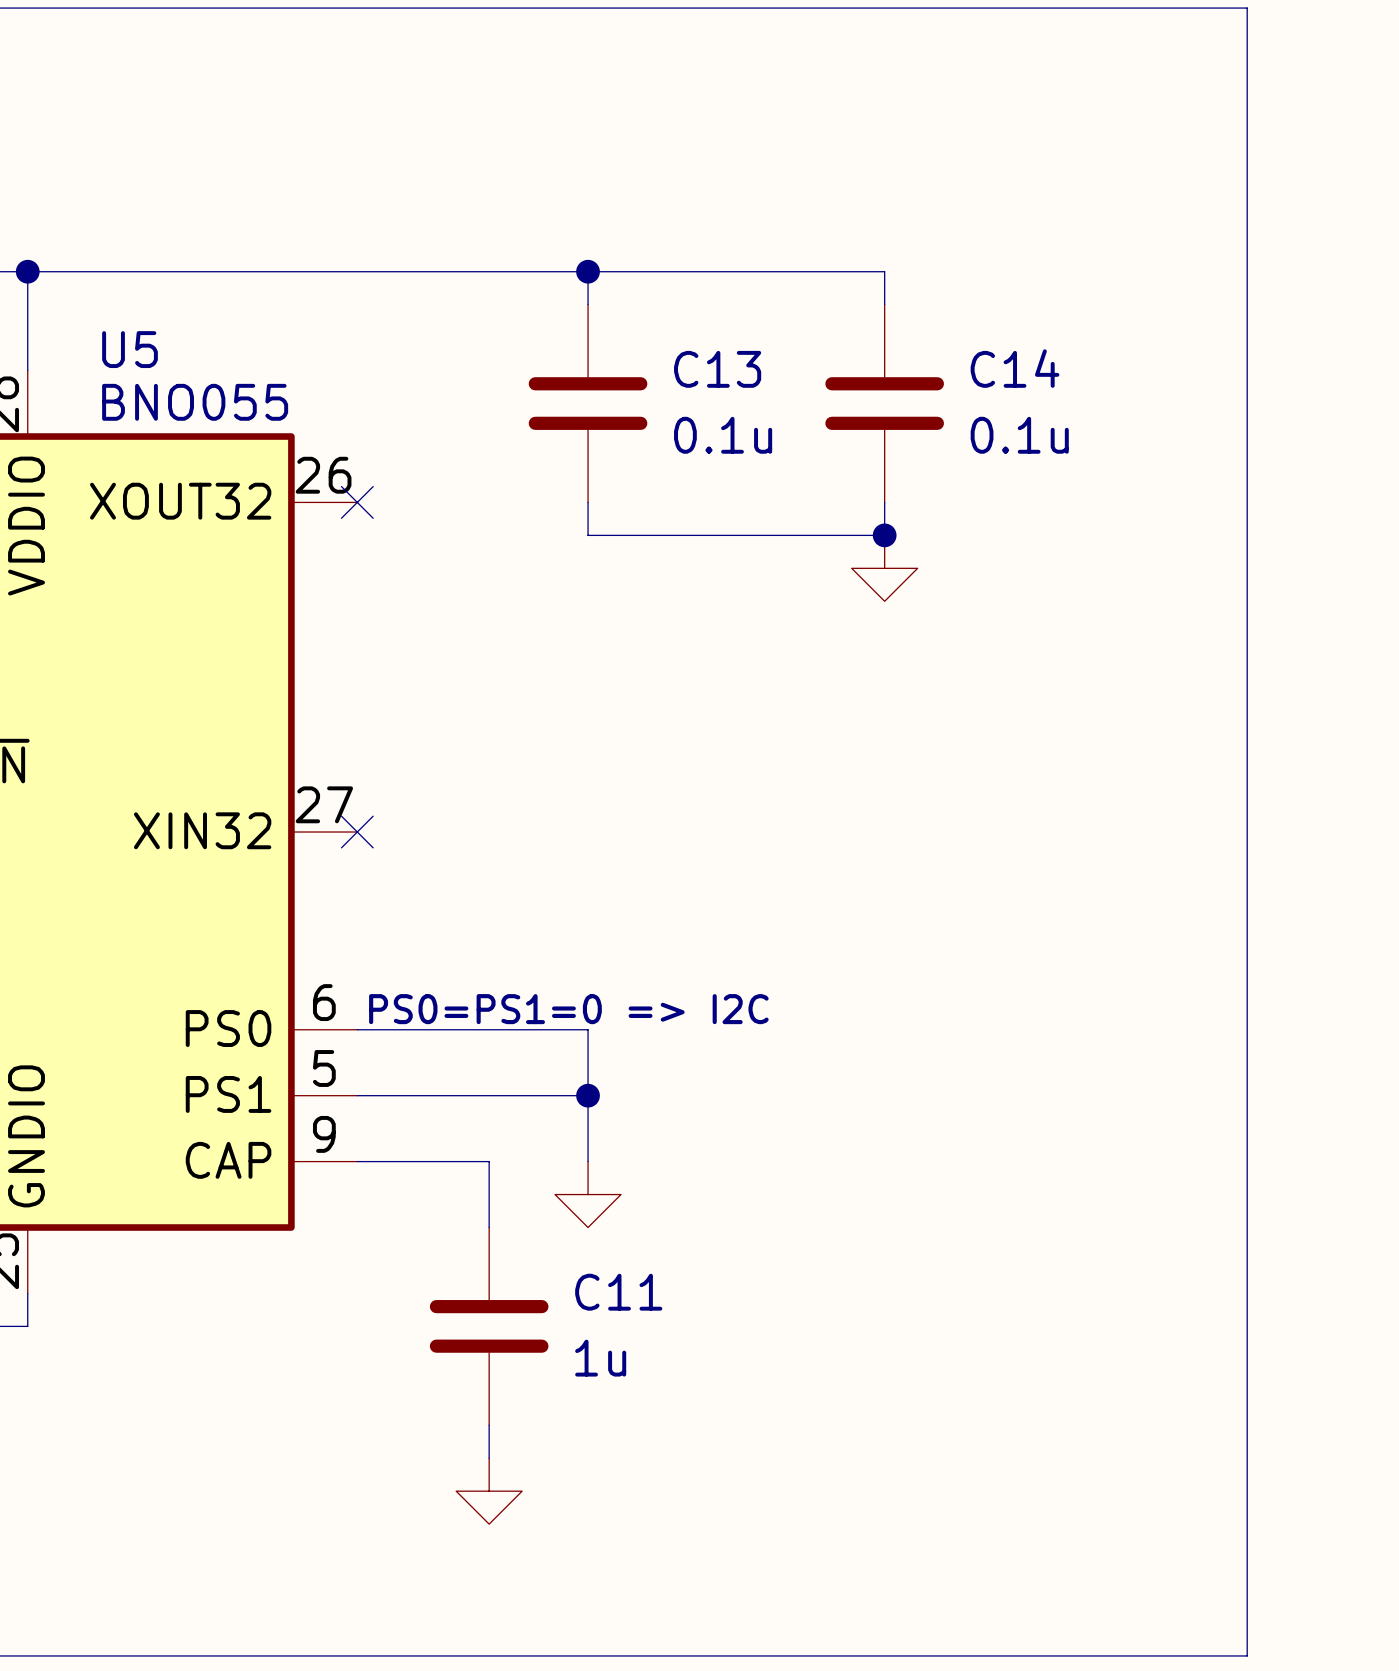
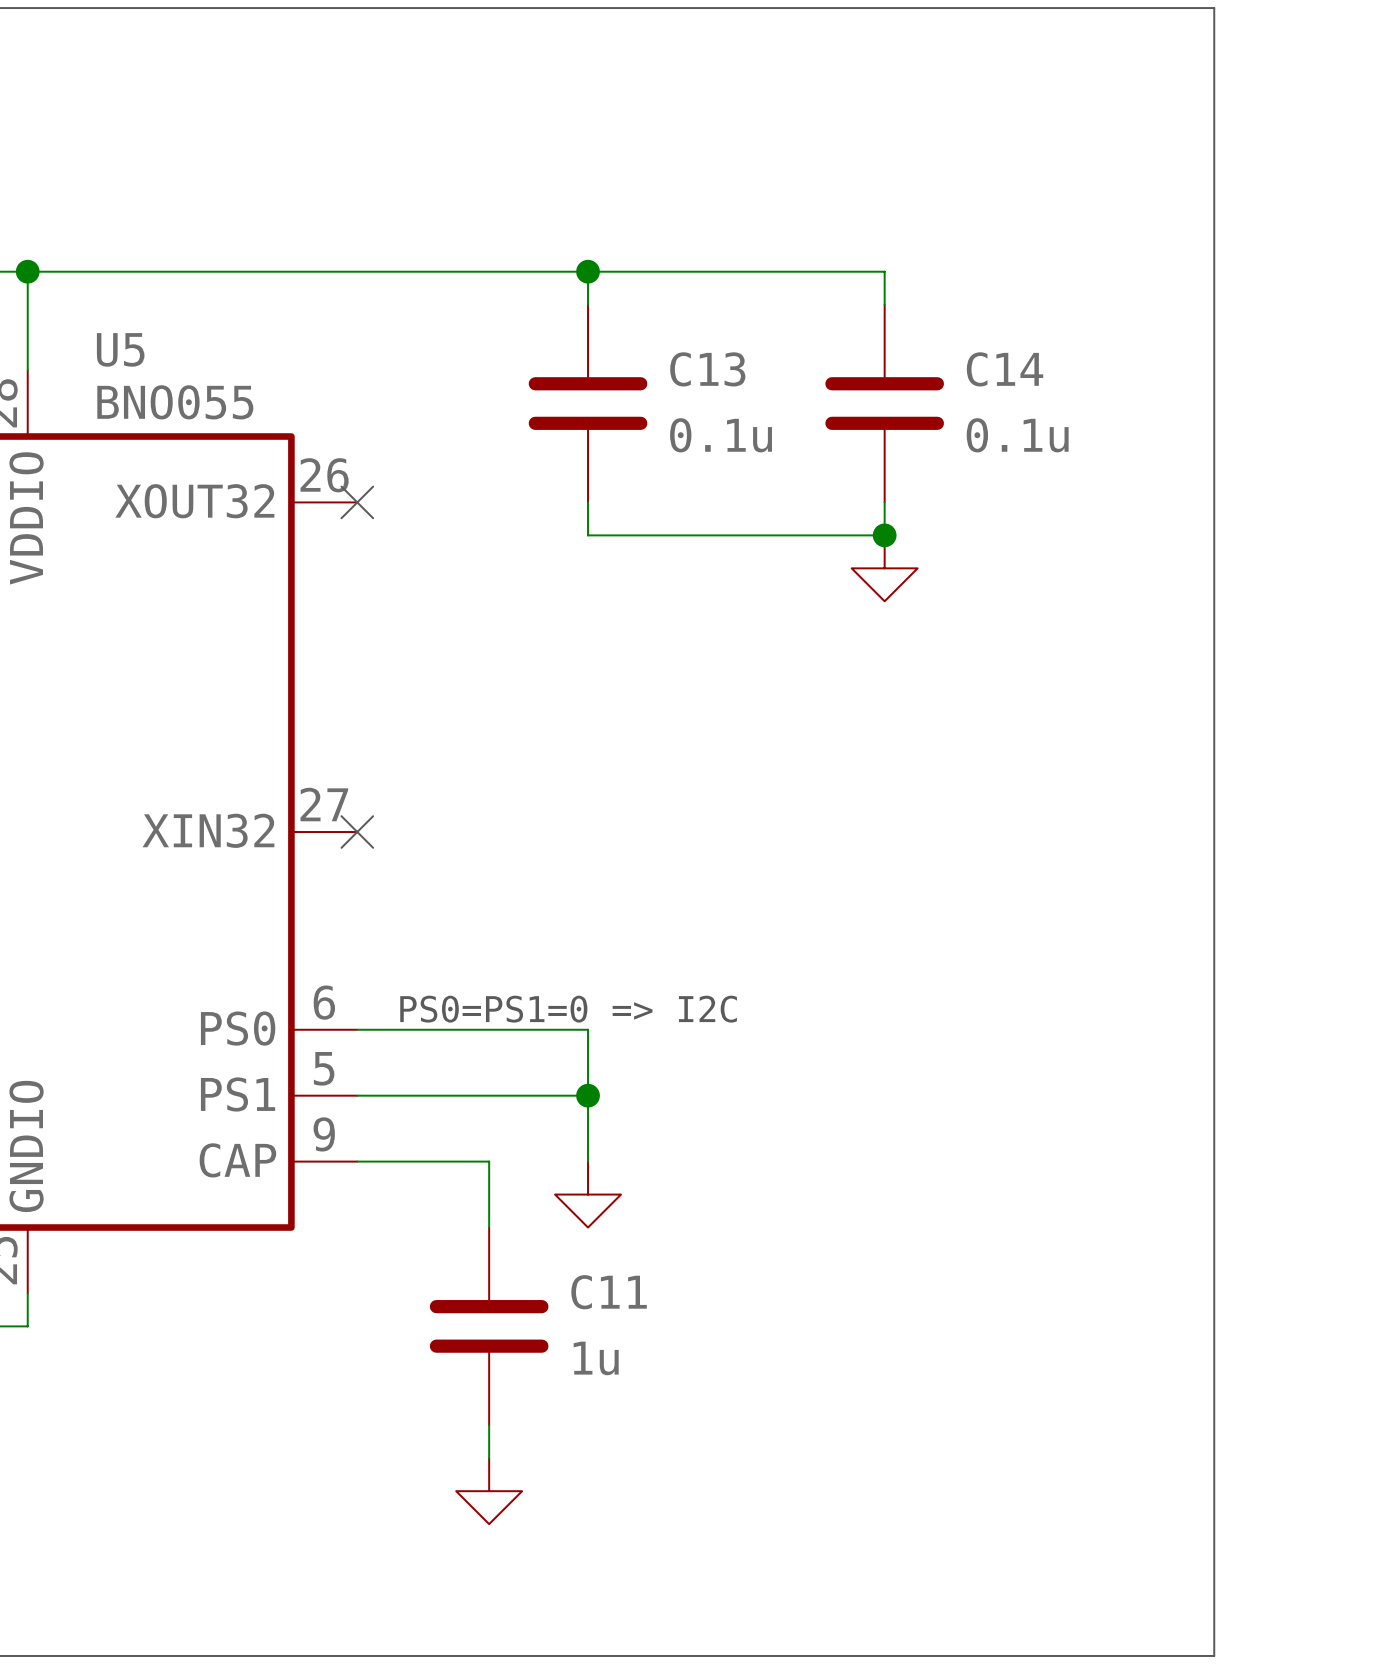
line: (1214, 8) (1247, 8) (1247, 1655) (1214, 1655) -> (1214, 8) (1214, 1655)

